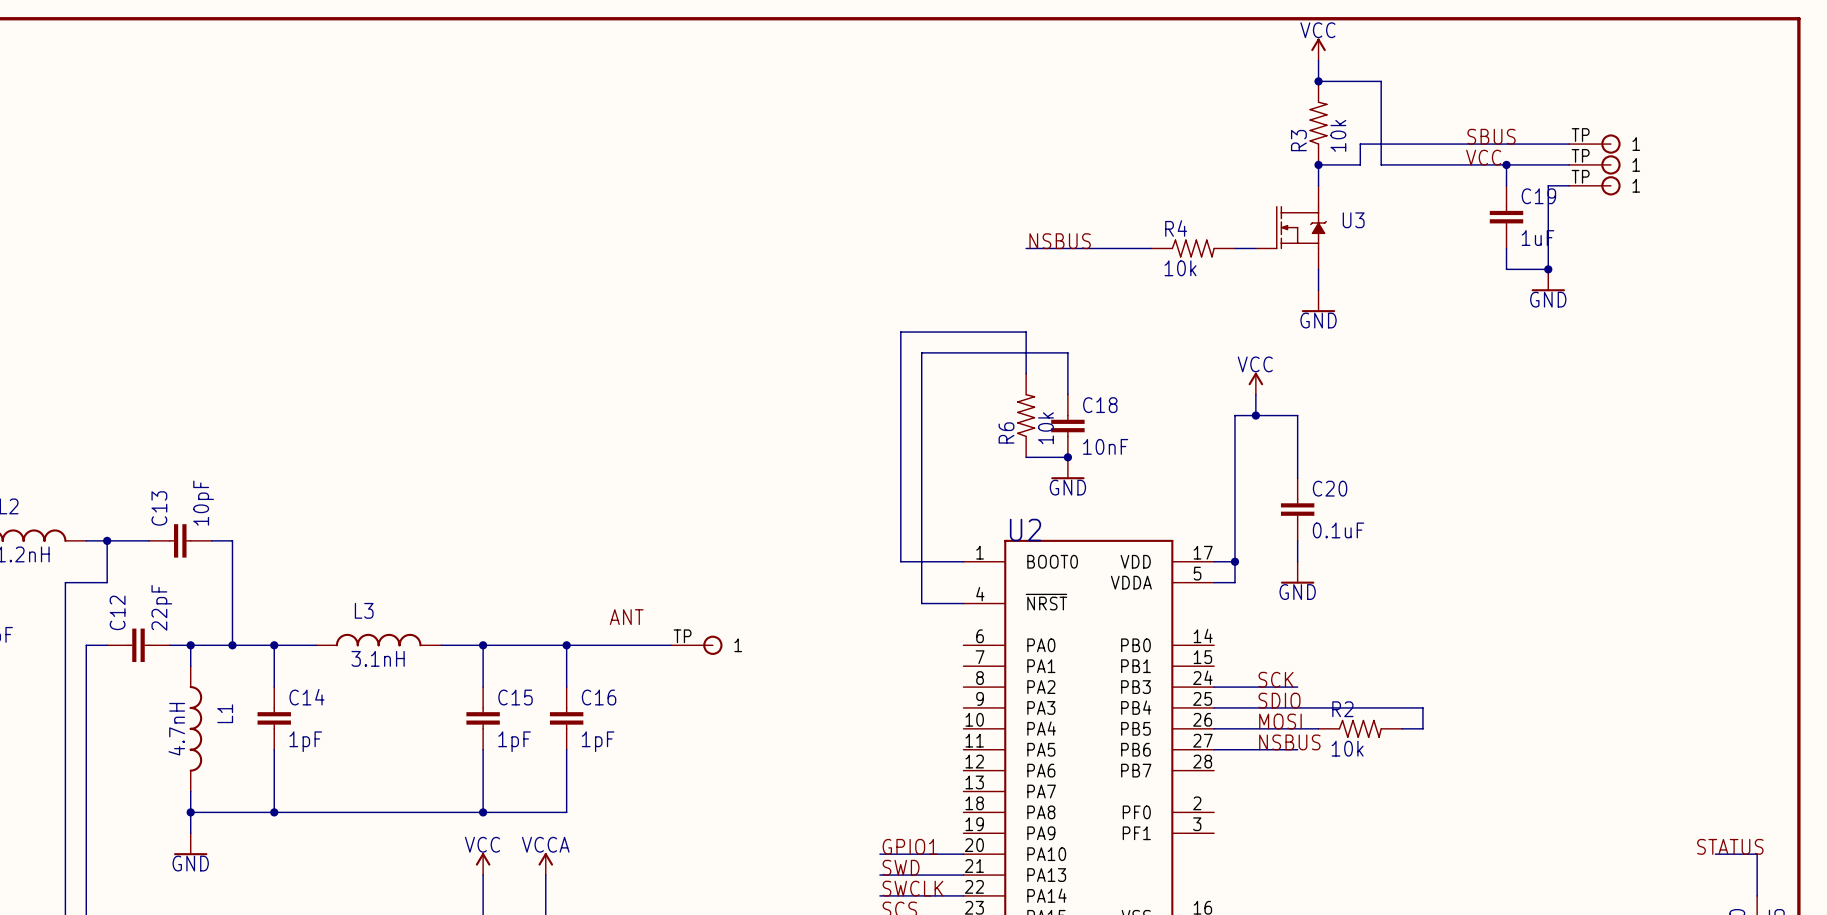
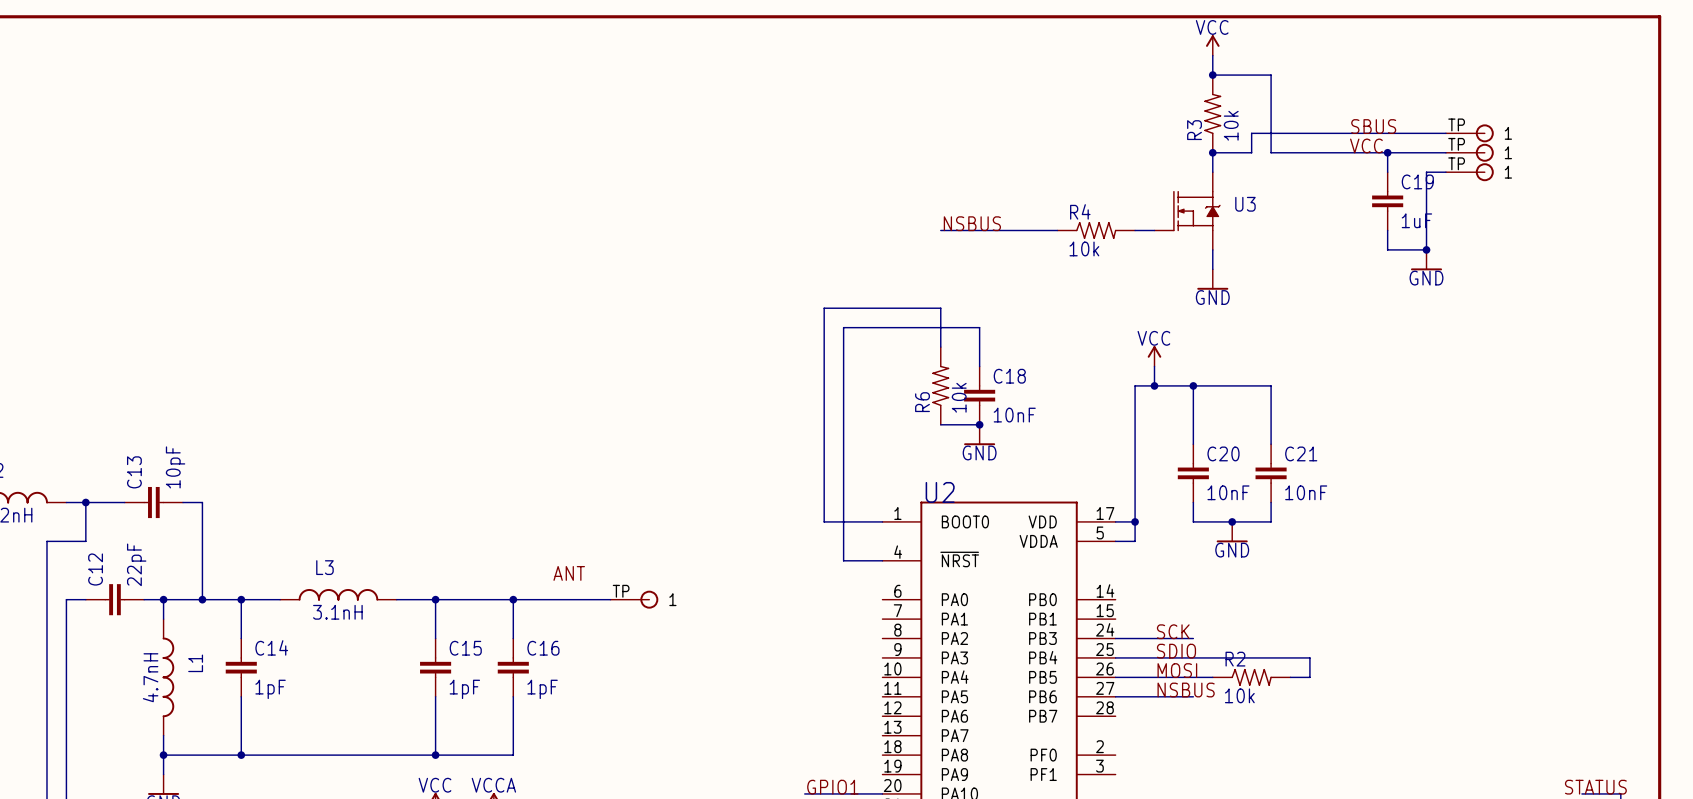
wire: none -> (1193, 385) (1271, 385) (1271, 444)
junction: none -> (1193, 385)
C21: none -> 10nF (1271, 473)
C20 value: 0.1uF (1338, 530) -> 10nF (1228, 492)
wire: none -> (1271, 502) (1271, 521) (1193, 521)
junction: none -> (1232, 521)
power symbol position: GND (1297, 572) -> GND (1232, 532)

